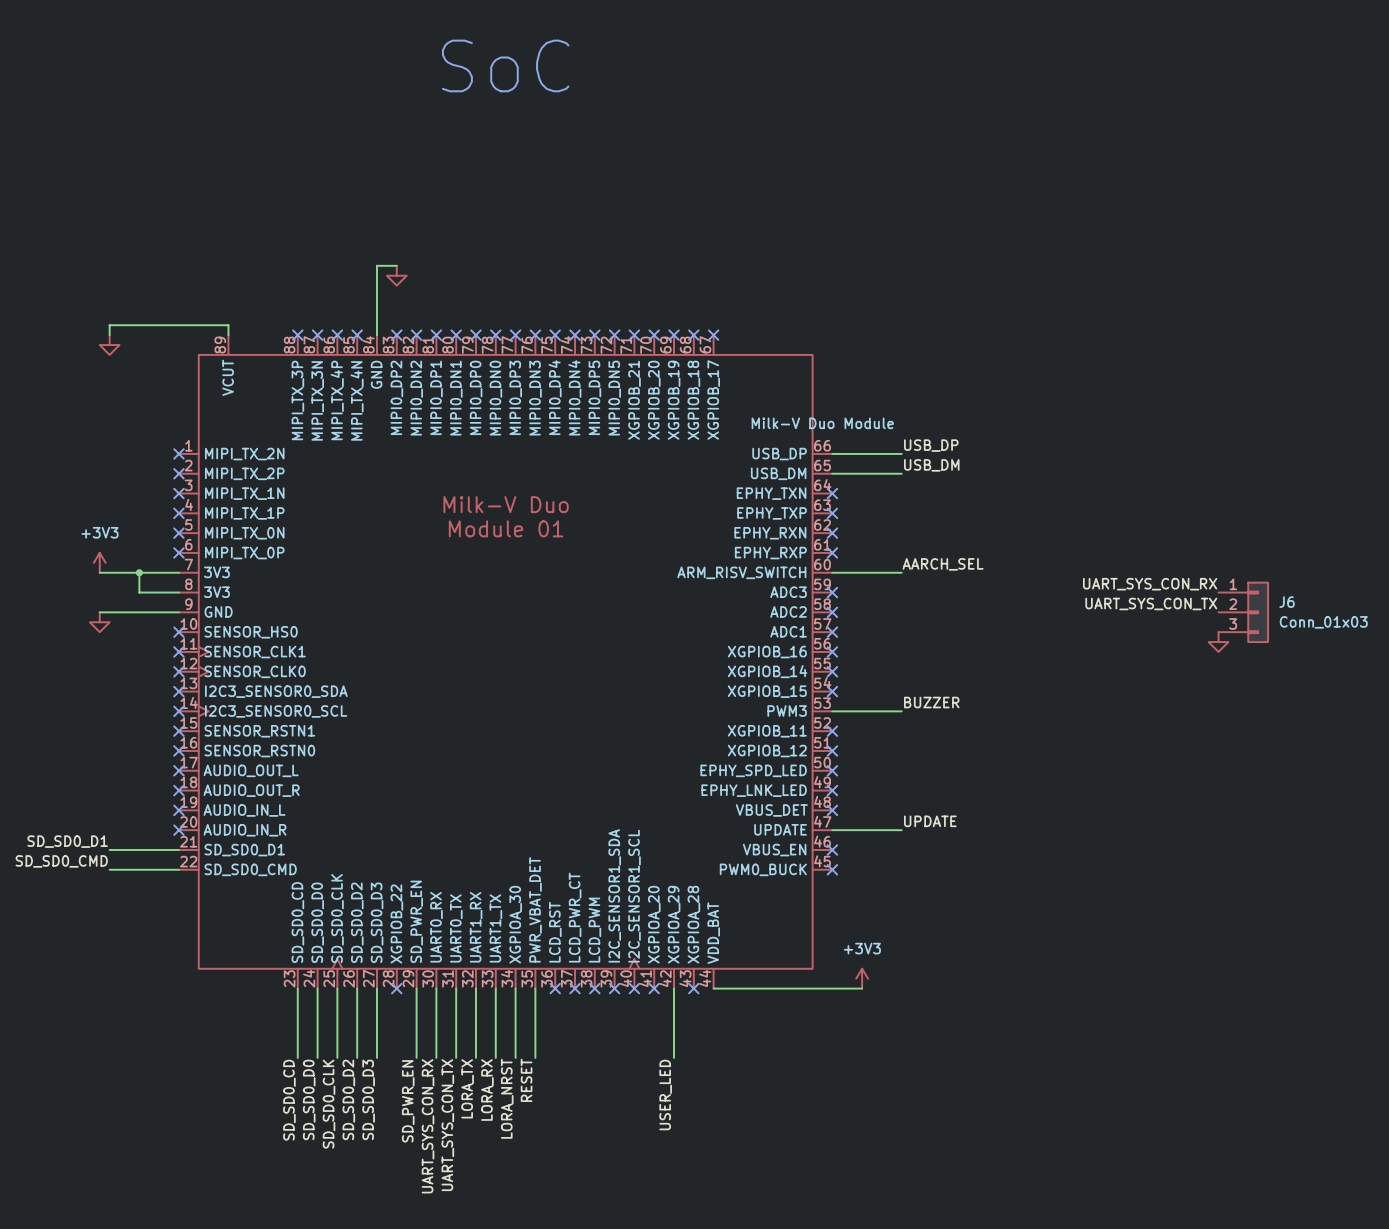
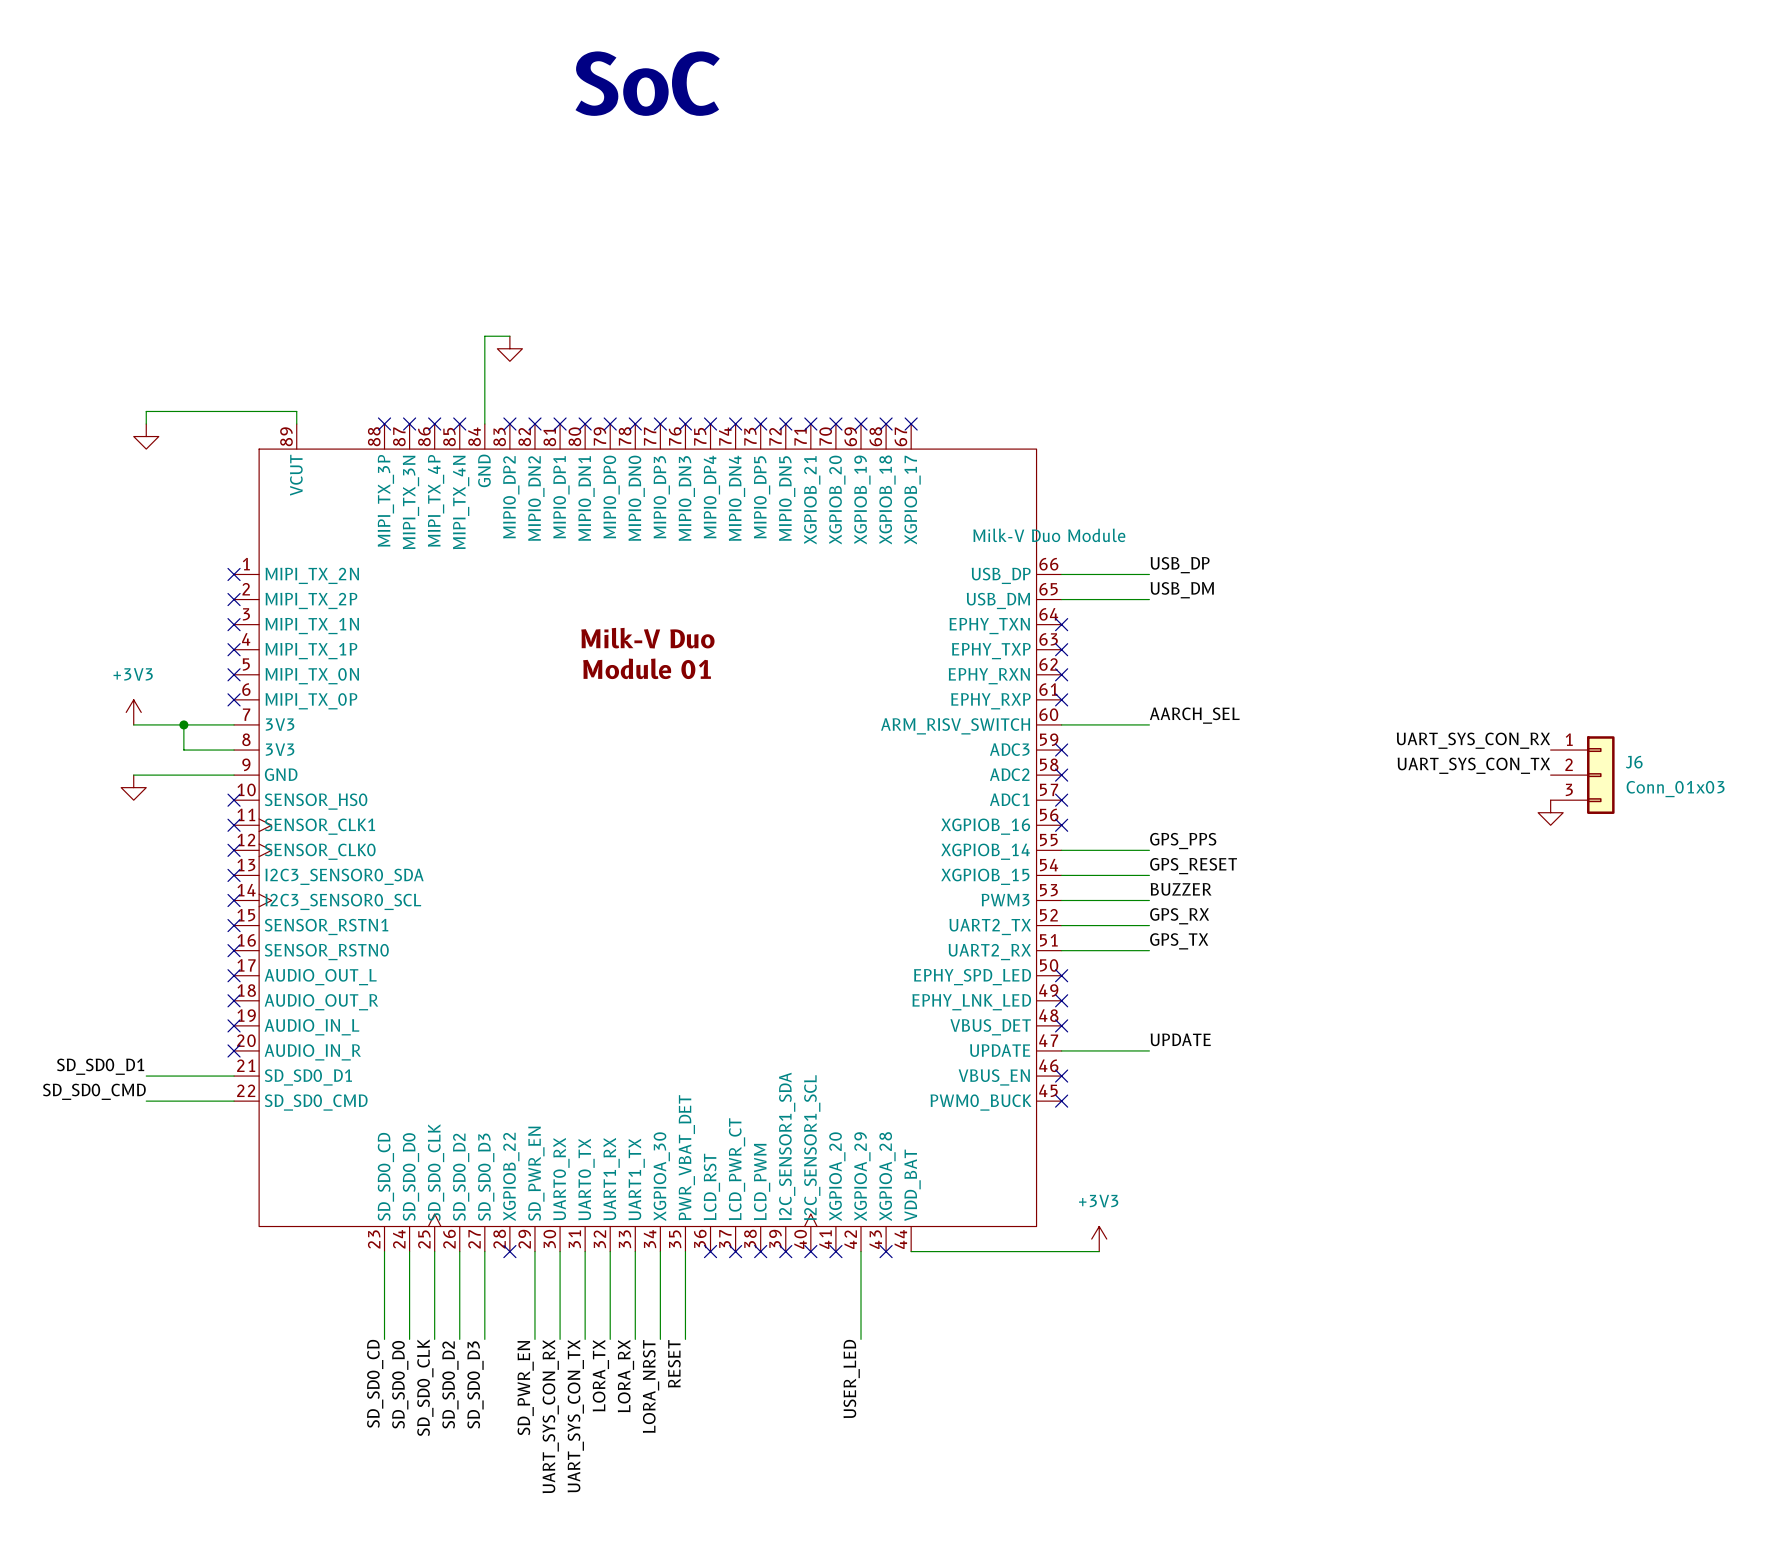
label: none -> GPS_PPS (1183, 841)
wire: none -> (1061, 850) (1149, 850)
no-connect mark: (832, 671) -> none
label: none -> GPS_RESET (1193, 866)
wire: none -> (1061, 875) (1149, 875)
no-connect mark: (832, 691) -> none
label: none -> GPS_RX (1179, 916)
part pin name: XGPIOB_11 (767, 731) -> UART2_TX (990, 926)
wire: none -> (1061, 925) (1149, 925)
no-connect mark: (832, 731) -> none
label: none -> GPS_TX (1179, 941)
wire: none -> (1061, 950) (1149, 950)
no-connect mark: (832, 750) -> none
part pin name: XGPIOB_12 (767, 751) -> UART2_RX (989, 952)

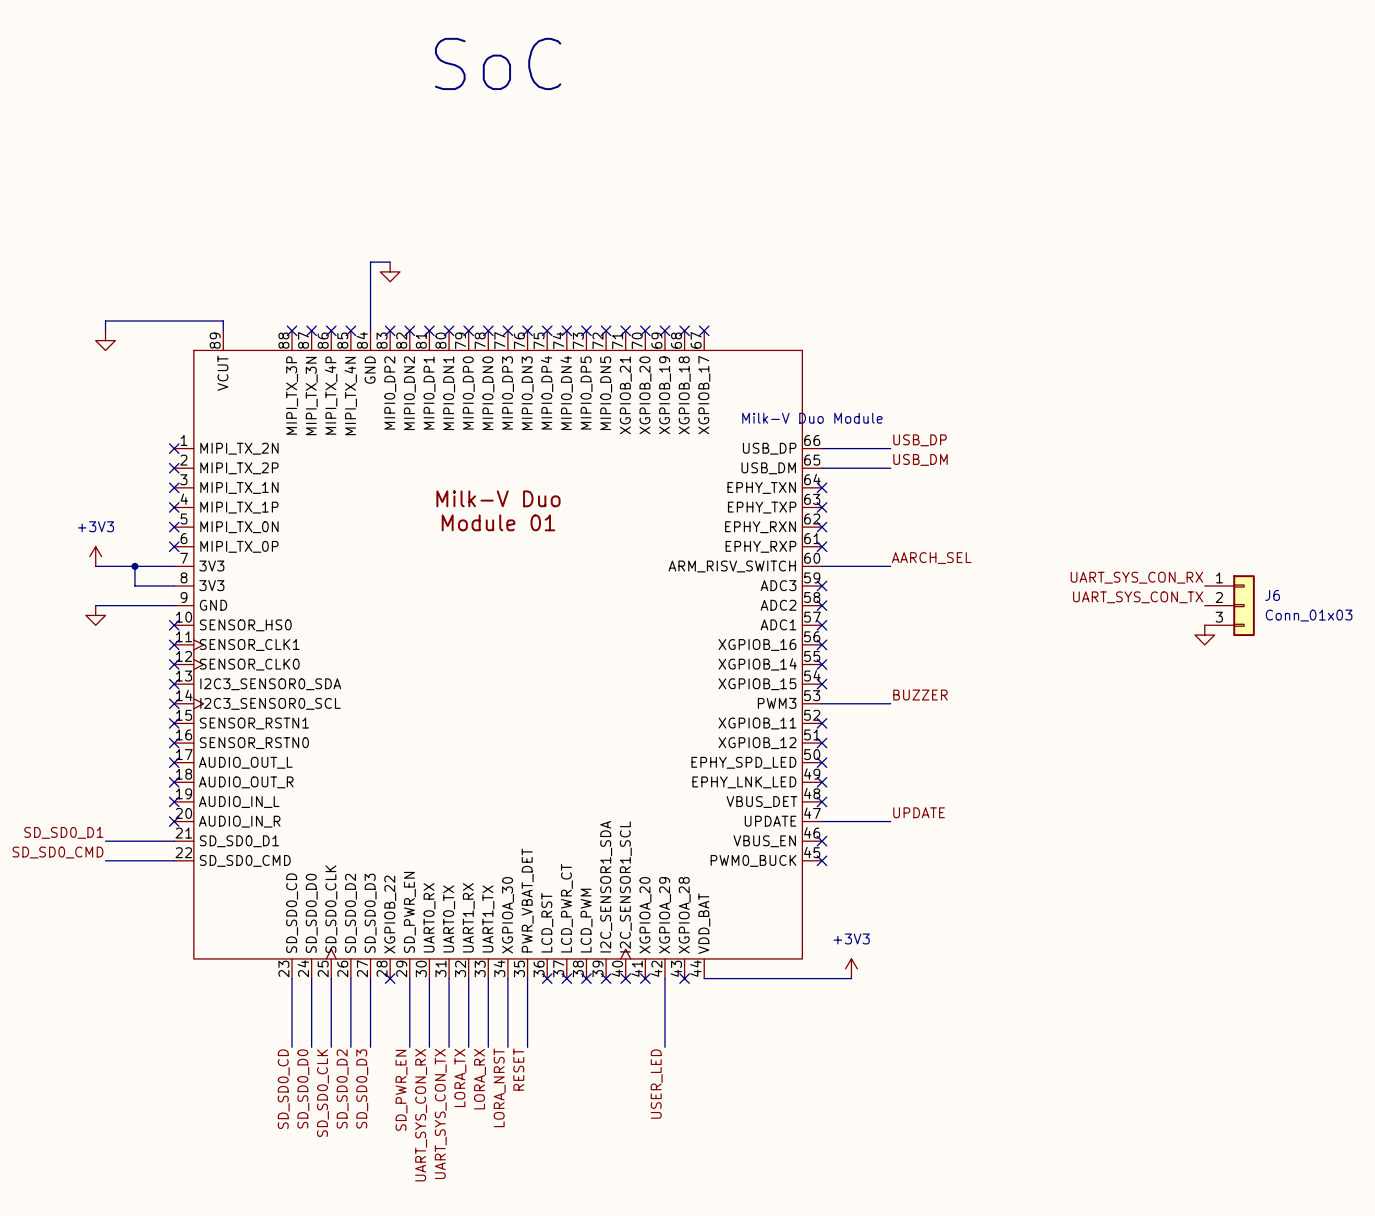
label: GPS_PPS (1183, 841) -> none
wire: (1061, 850) (1149, 850) -> none
no-connect mark: none -> (822, 664)
label: GPS_RESET (1193, 866) -> none
wire: (1061, 875) (1149, 875) -> none
no-connect mark: none -> (822, 684)
label: GPS_RX (1179, 916) -> none
wire: (1061, 925) (1149, 925) -> none
no-connect mark: none -> (822, 723)
part pin name: UART2_TX (990, 926) -> XGPIOB_11 (757, 723)
label: GPS_TX (1179, 941) -> none
wire: (1061, 950) (1149, 950) -> none
no-connect mark: none -> (822, 743)
part pin name: UART2_RX (989, 952) -> XGPIOB_12 (757, 743)

